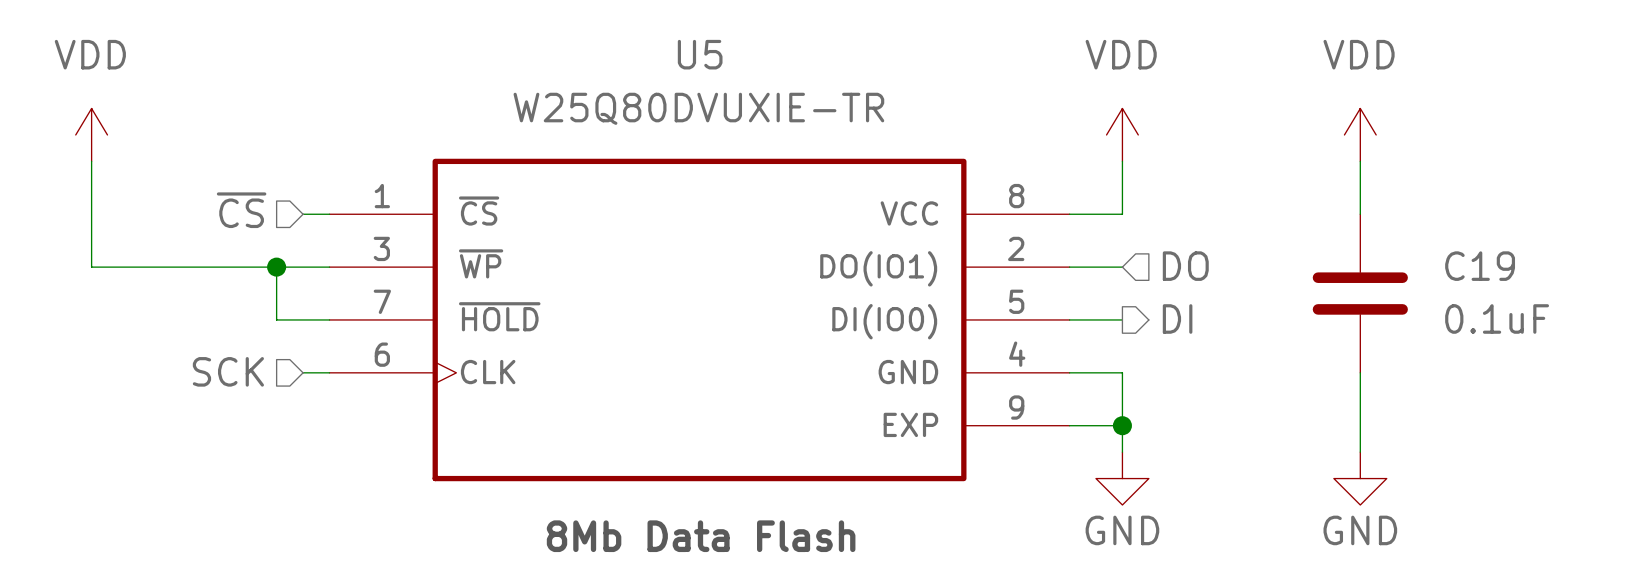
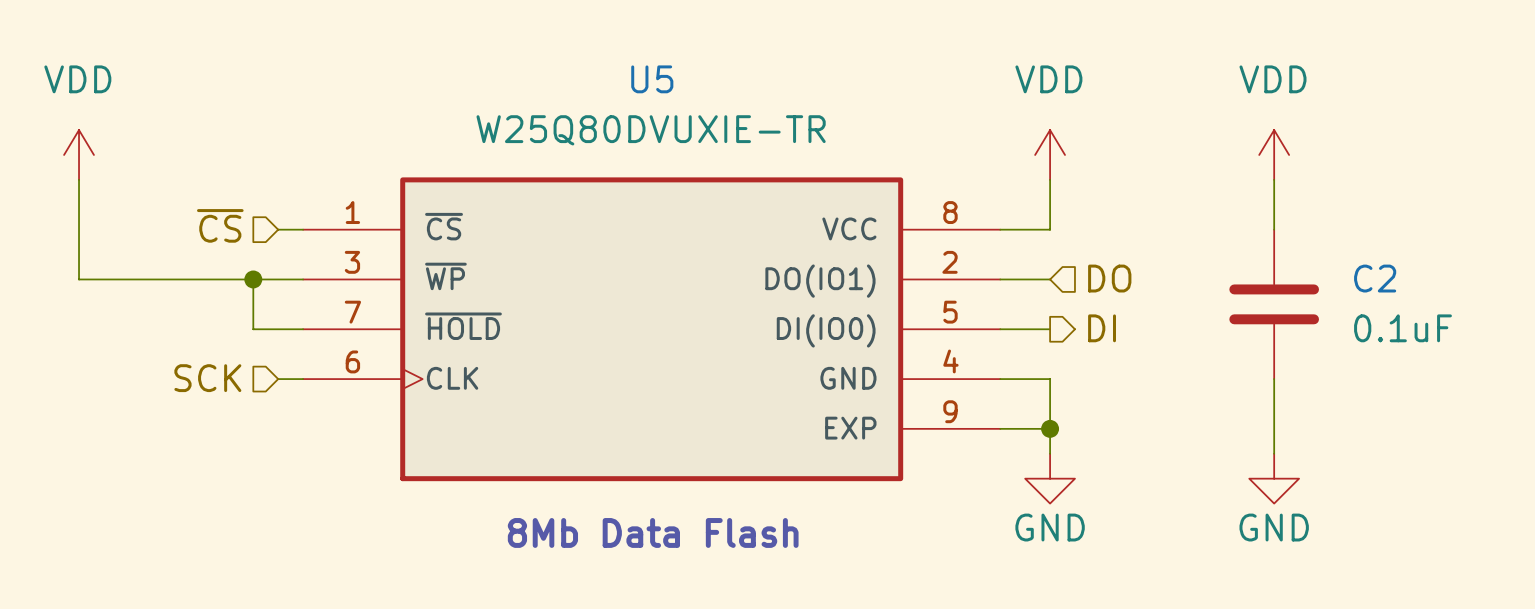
C19 name: C19 (1480, 266) -> C2 (1375, 278)

